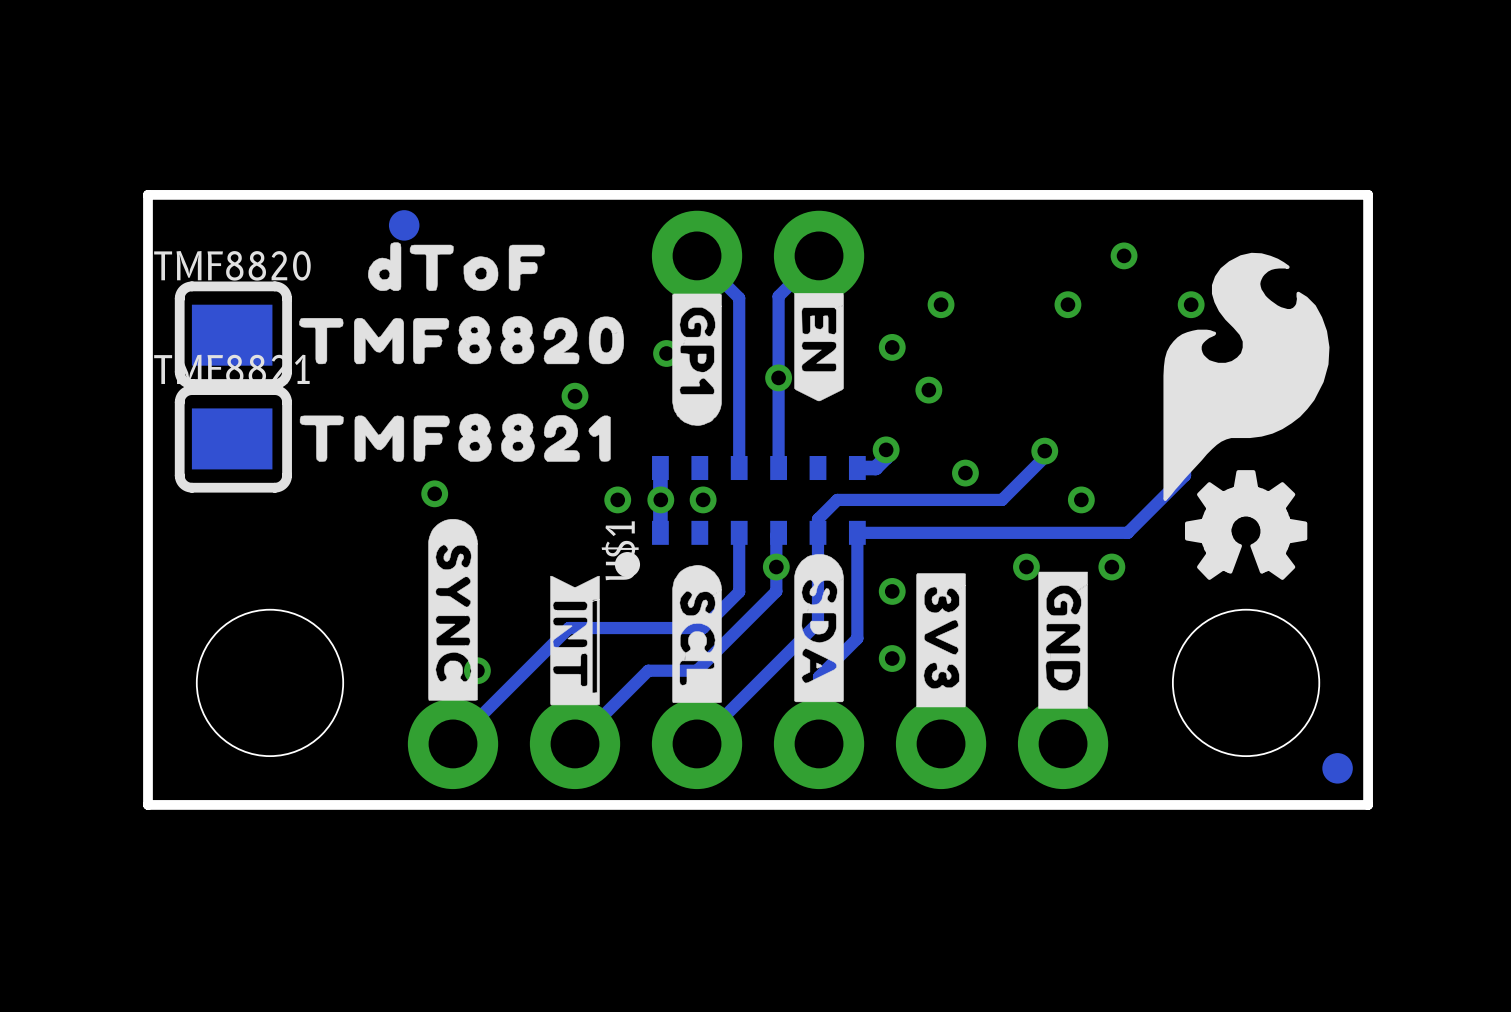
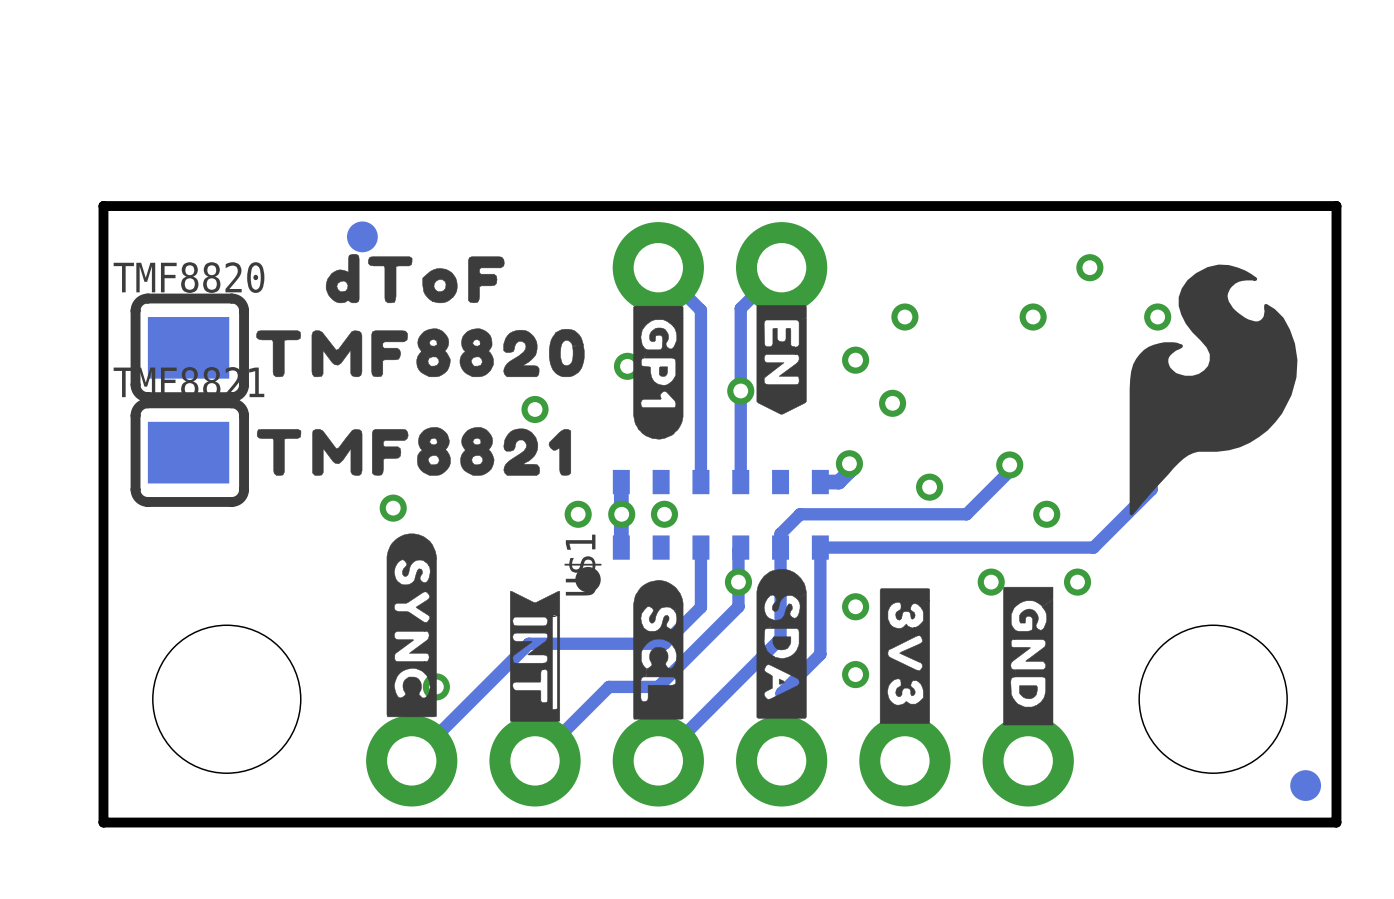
drawing: [1185, 470, 1308, 580] -> none

